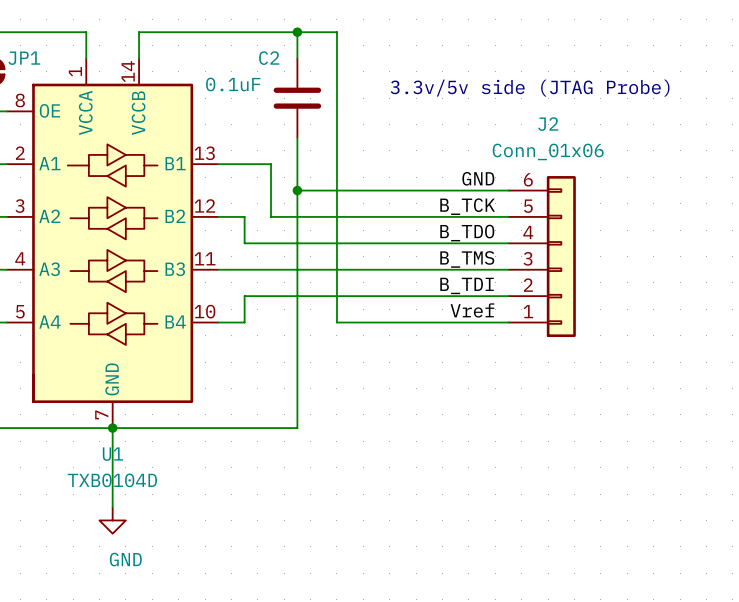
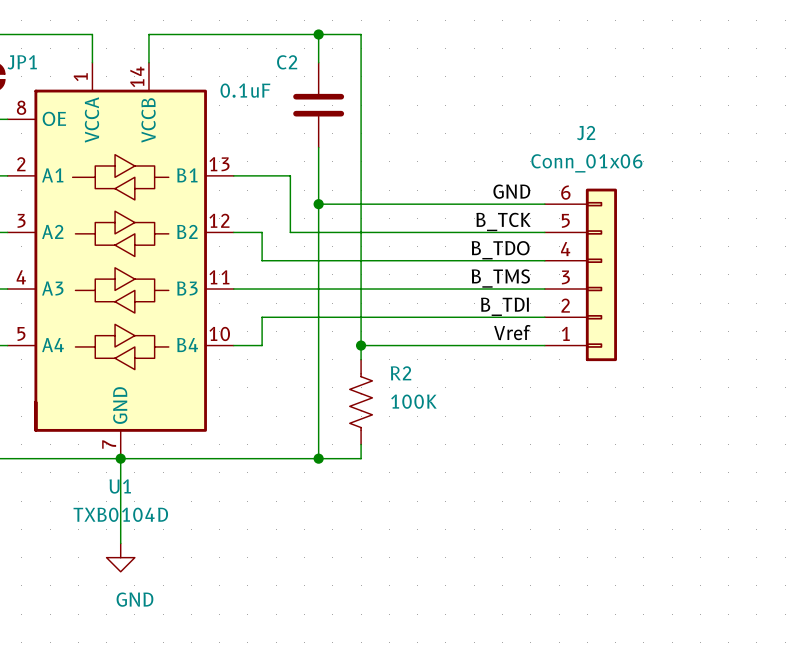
text: 3.3v/5v side (JTAG Probe) (530, 88) -> none
wire: none -> (361, 345) (361, 359)
junction: none -> (361, 345)
R2: none -> 100K (361, 402)
wire: none -> (361, 444) (361, 458) (318, 458)
junction: none -> (318, 458)

